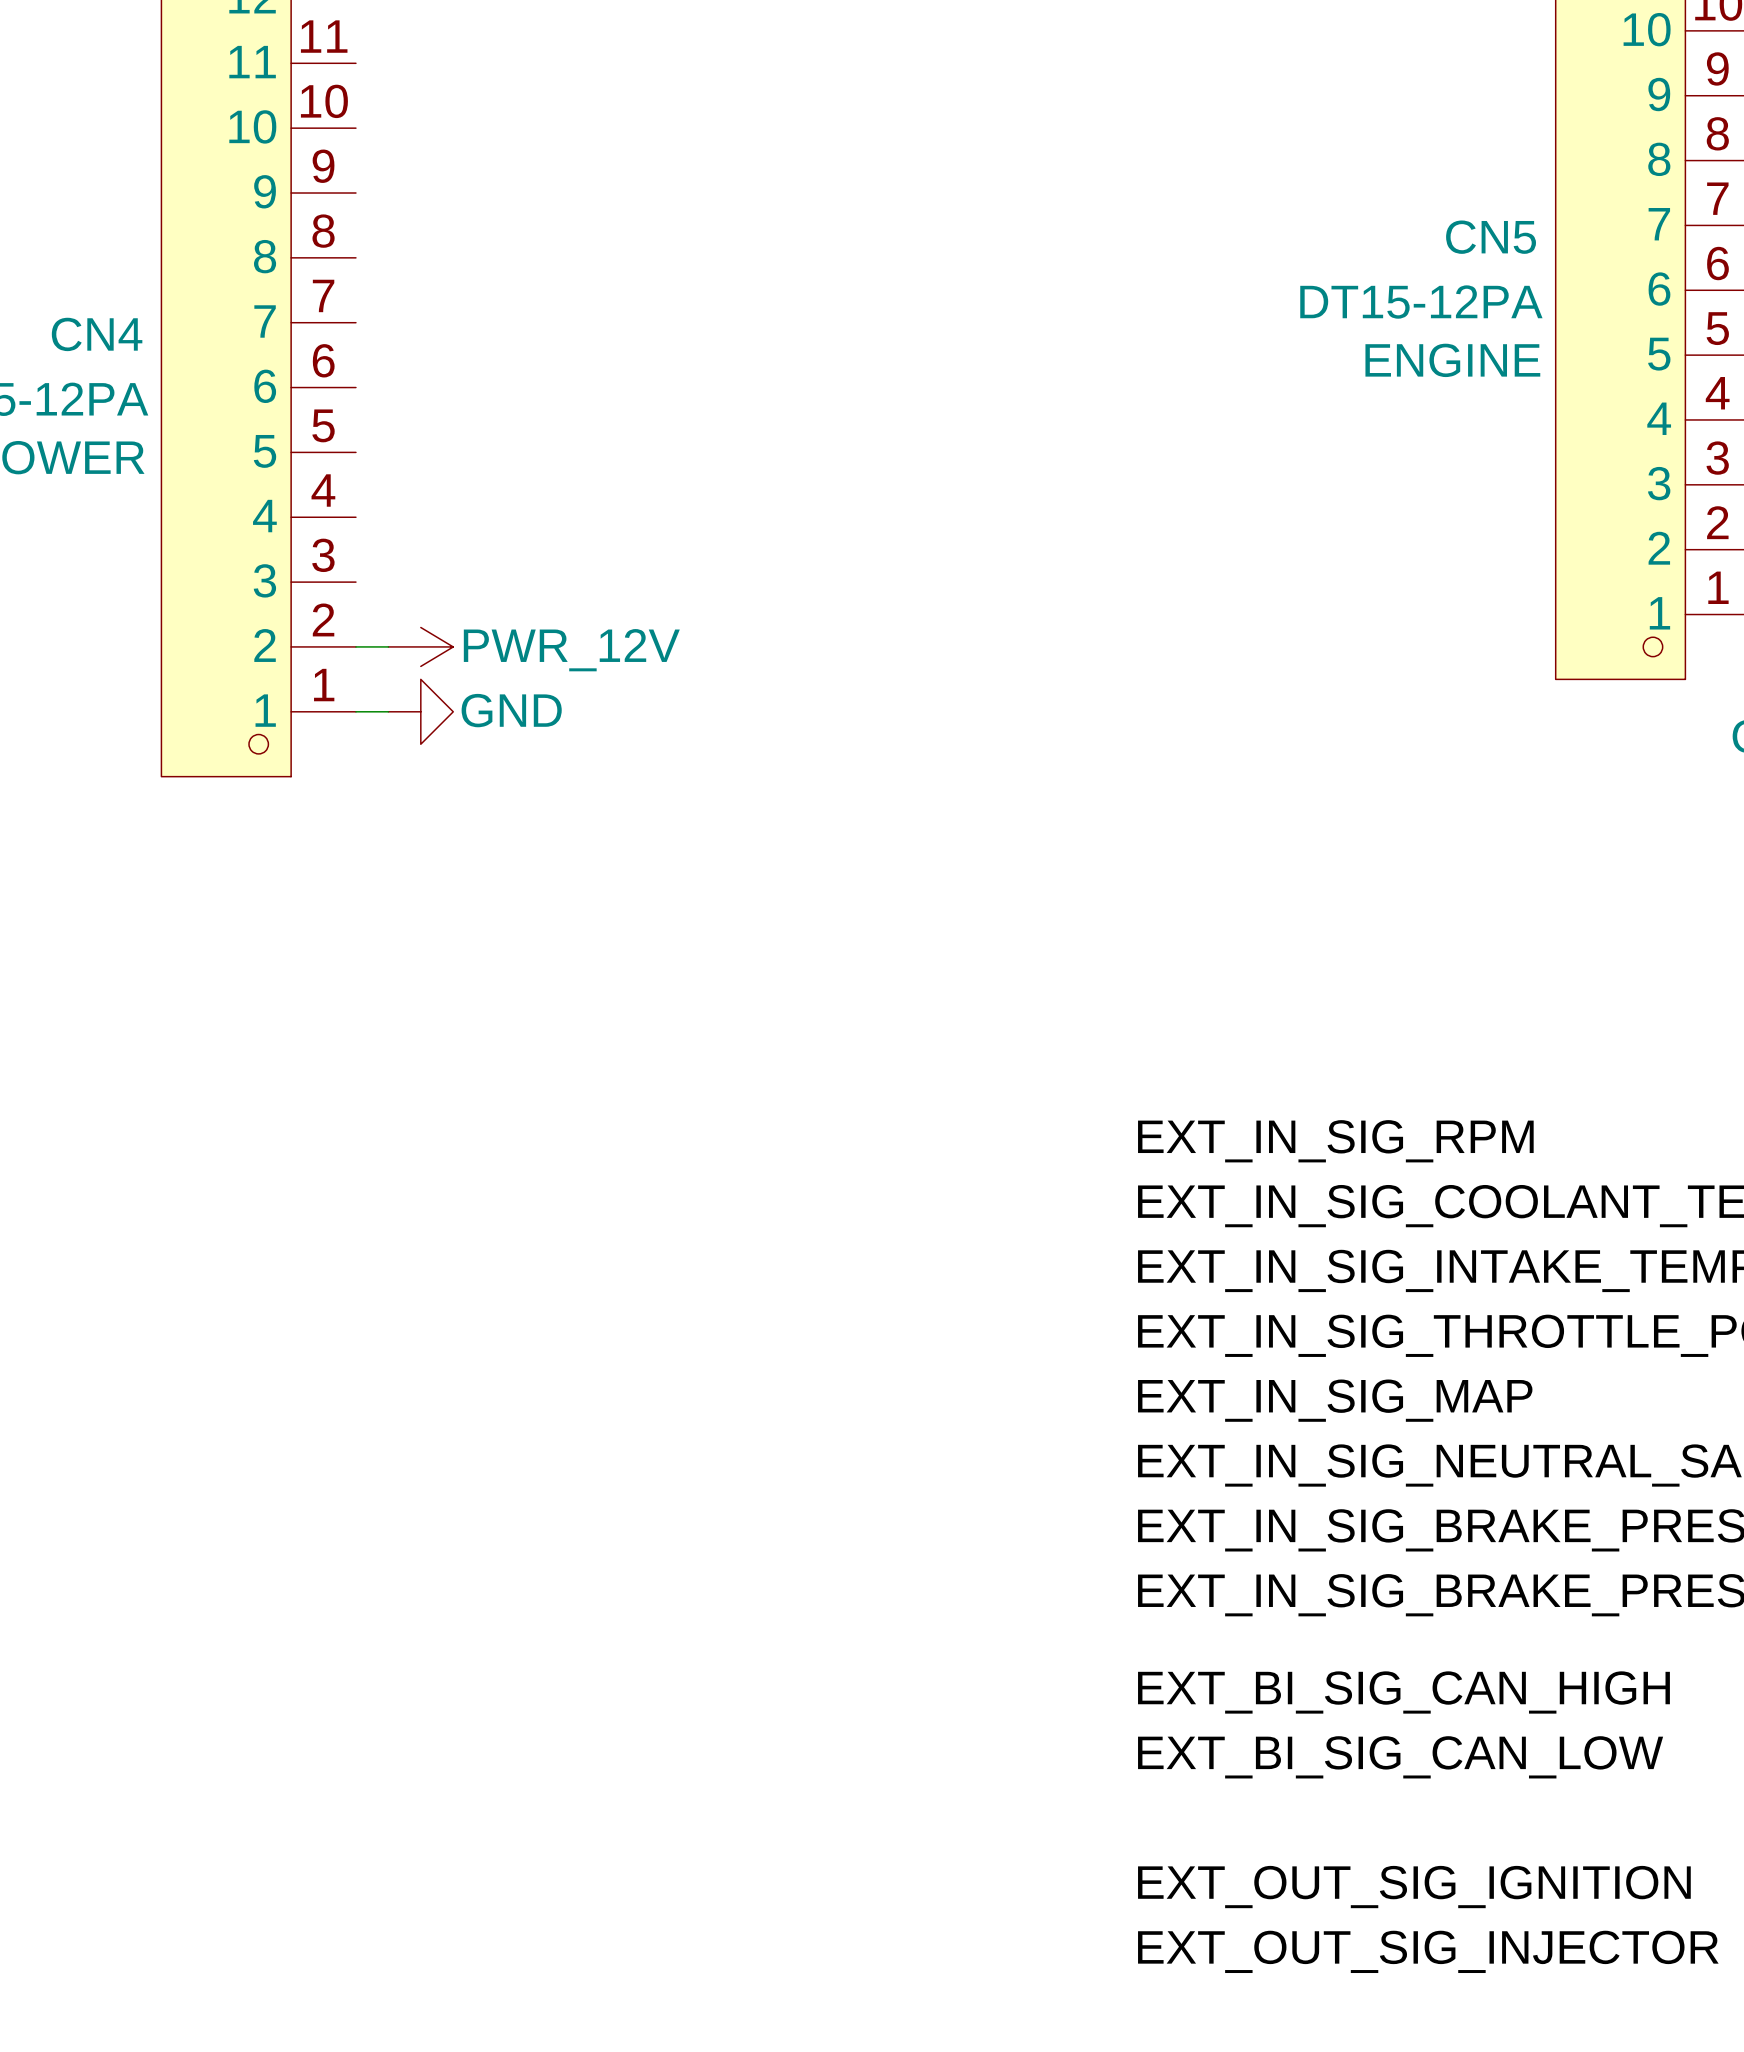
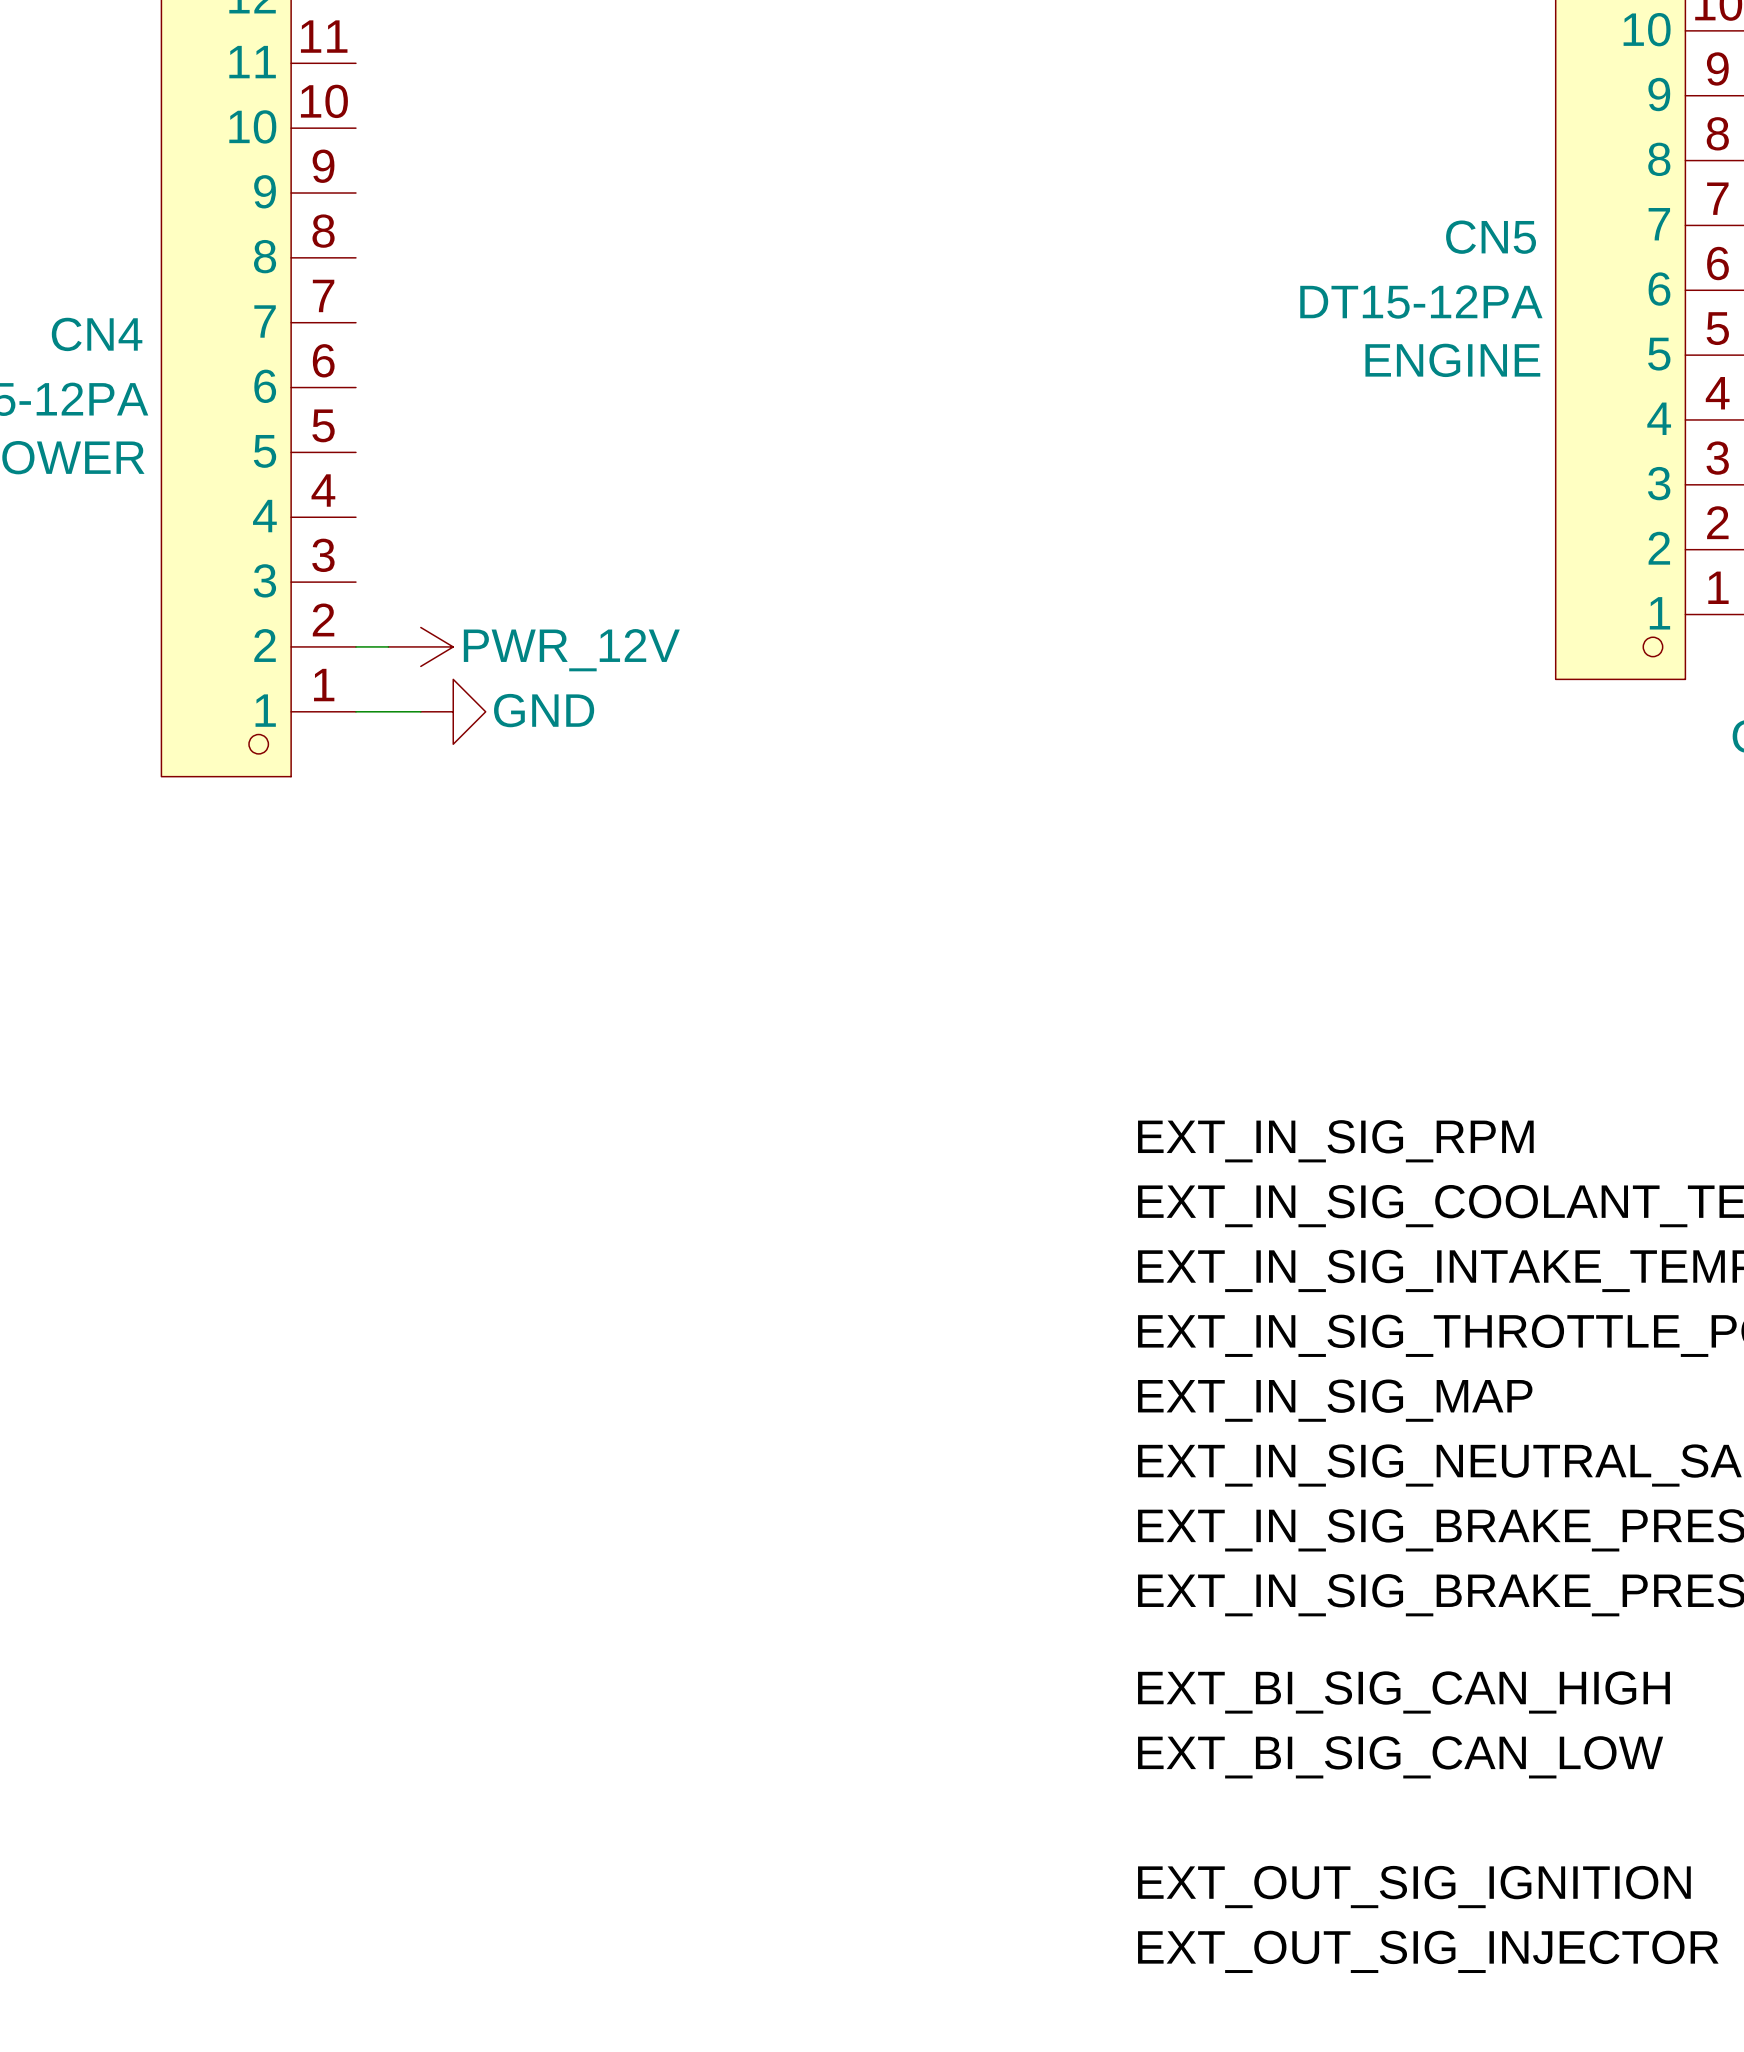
power symbol position: GND (420, 711) -> GND (453, 711)

